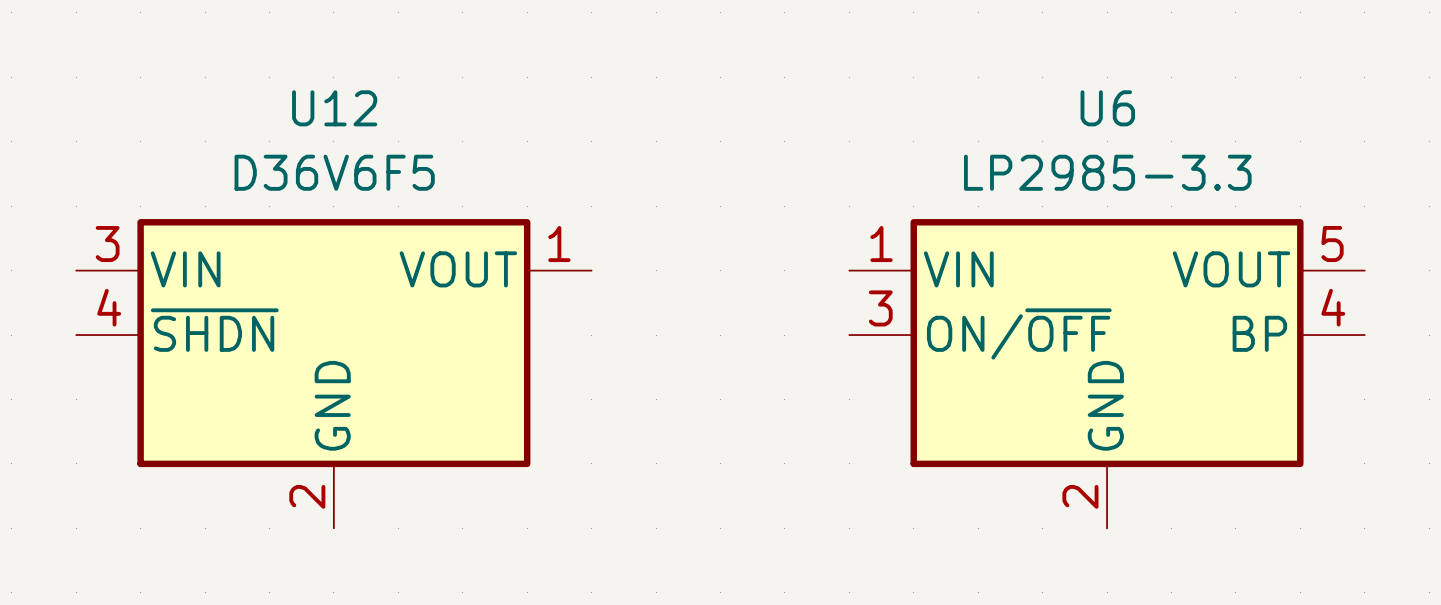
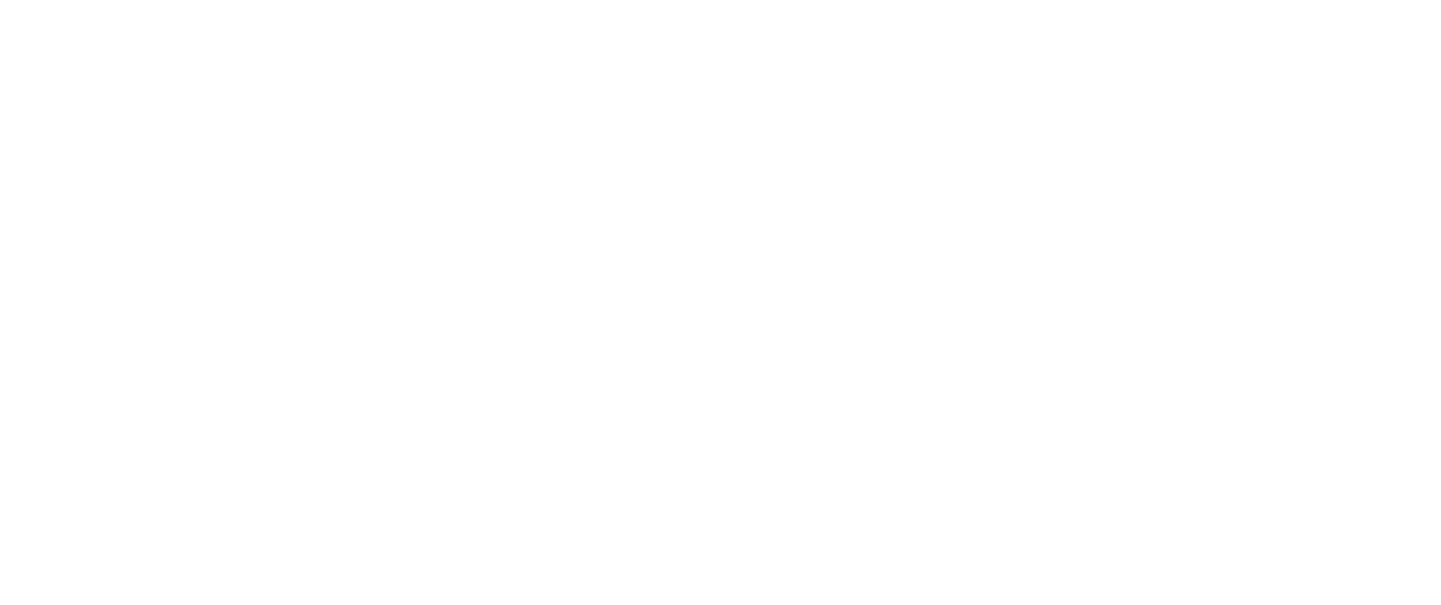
U12: D36V6F5 (333, 373) -> none
U6: LP2985-3.3 (1107, 373) -> none

